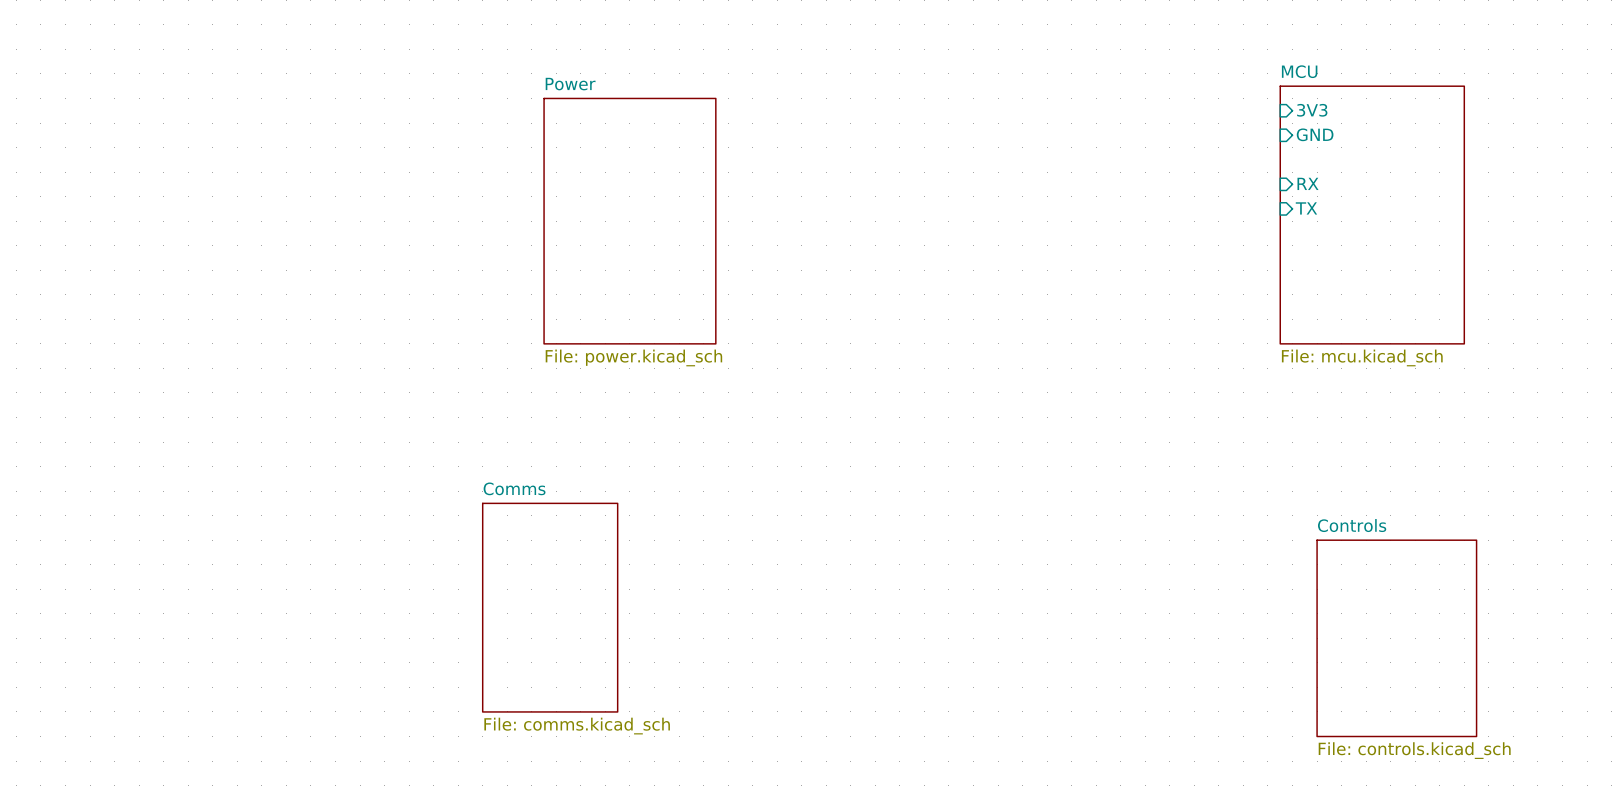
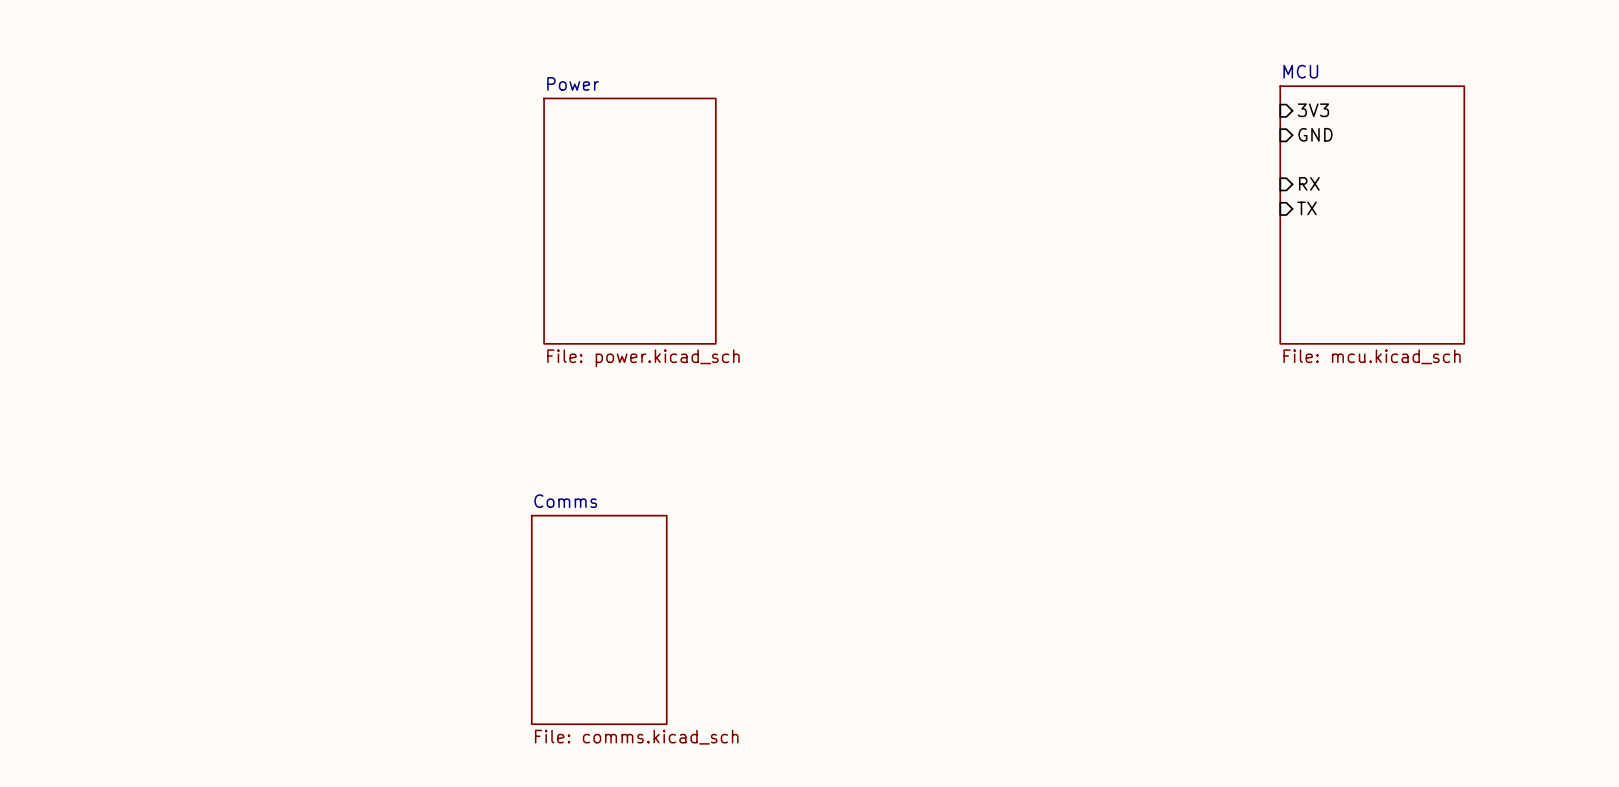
sheet Comms position: (550, 607) -> (599, 619)
sheet Controls: File: controls.kicad_sch (1396, 638) -> none

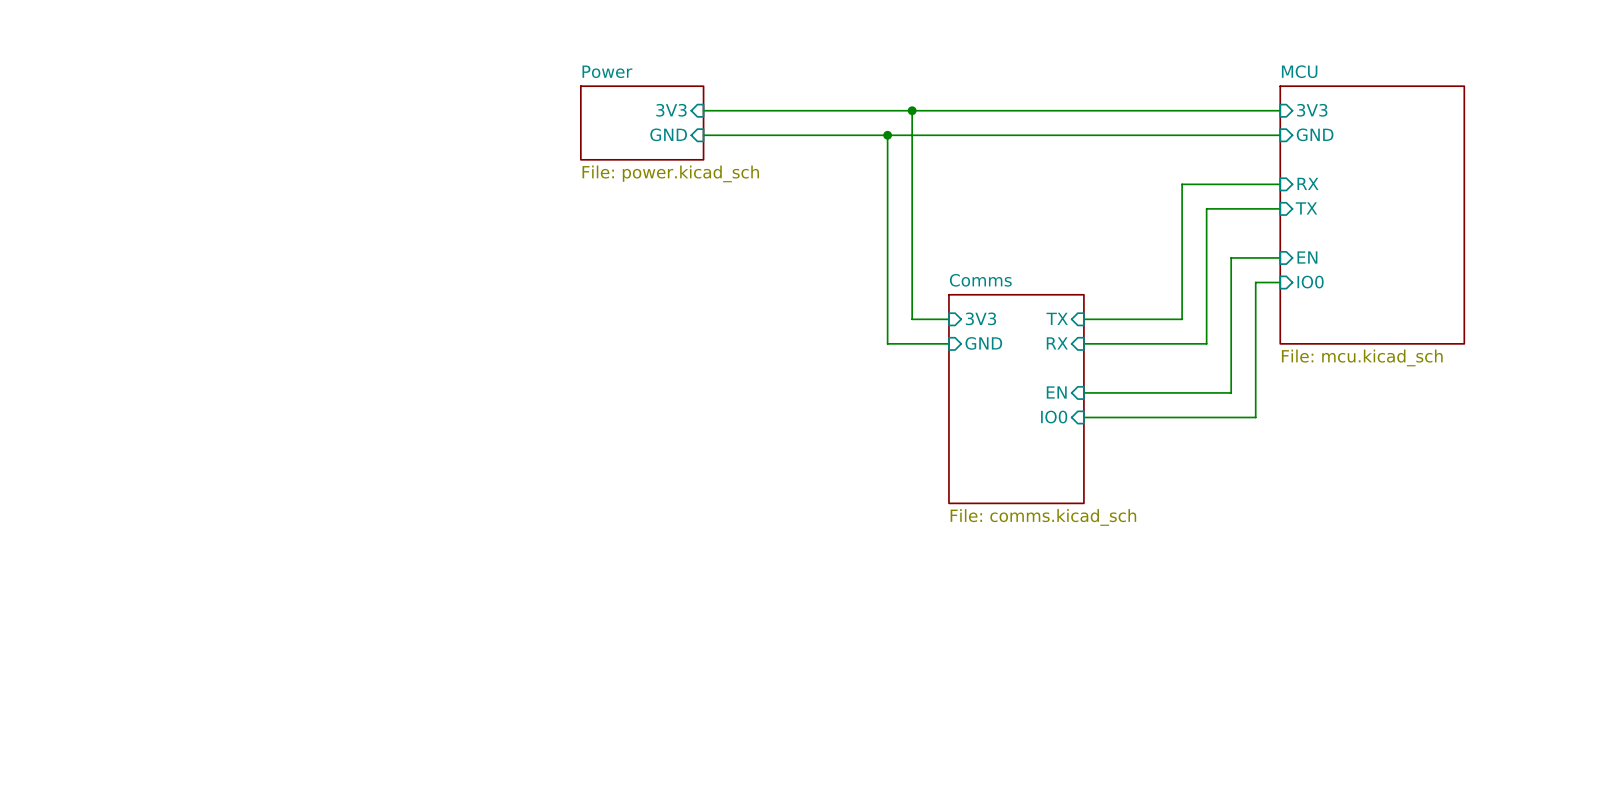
sheet pin: none -> 3V3 (671, 110)
wire: none -> (703, 110) (1280, 110)
wire: none -> (912, 110) (912, 319) (948, 319)
junction: none -> (912, 110)
sheet Power: none -> File: power.kicad_sch (642, 123)
sheet pin: none -> GND (668, 134)
wire: none -> (703, 135) (1280, 135)
wire: none -> (887, 135) (887, 343) (948, 343)
junction: none -> (887, 135)
wire: none -> (1280, 184) (1182, 184) (1182, 319) (1083, 319)
wire: none -> (1280, 208) (1206, 208) (1206, 343) (1083, 343)
sheet Power: File: power.kicad_sch (629, 221) -> none
wire: none -> (1280, 257) (1231, 257) (1231, 392) (1083, 392)
sheet pin: none -> EN (1307, 257)
wire: none -> (1280, 282) (1255, 282) (1255, 417) (1083, 417)
sheet pin: none -> IO0 (1310, 282)
sheet pin: none -> 3V3 (980, 318)
sheet pin: none -> TX (1057, 318)
sheet pin: none -> GND (983, 343)
sheet pin: none -> RX (1057, 343)
sheet pin: none -> EN (1056, 392)
sheet Comms: none -> File: comms.kicad_sch (1016, 399)
sheet pin: none -> IO0 (1054, 417)
sheet Comms: File: comms.kicad_sch (599, 619) -> none

